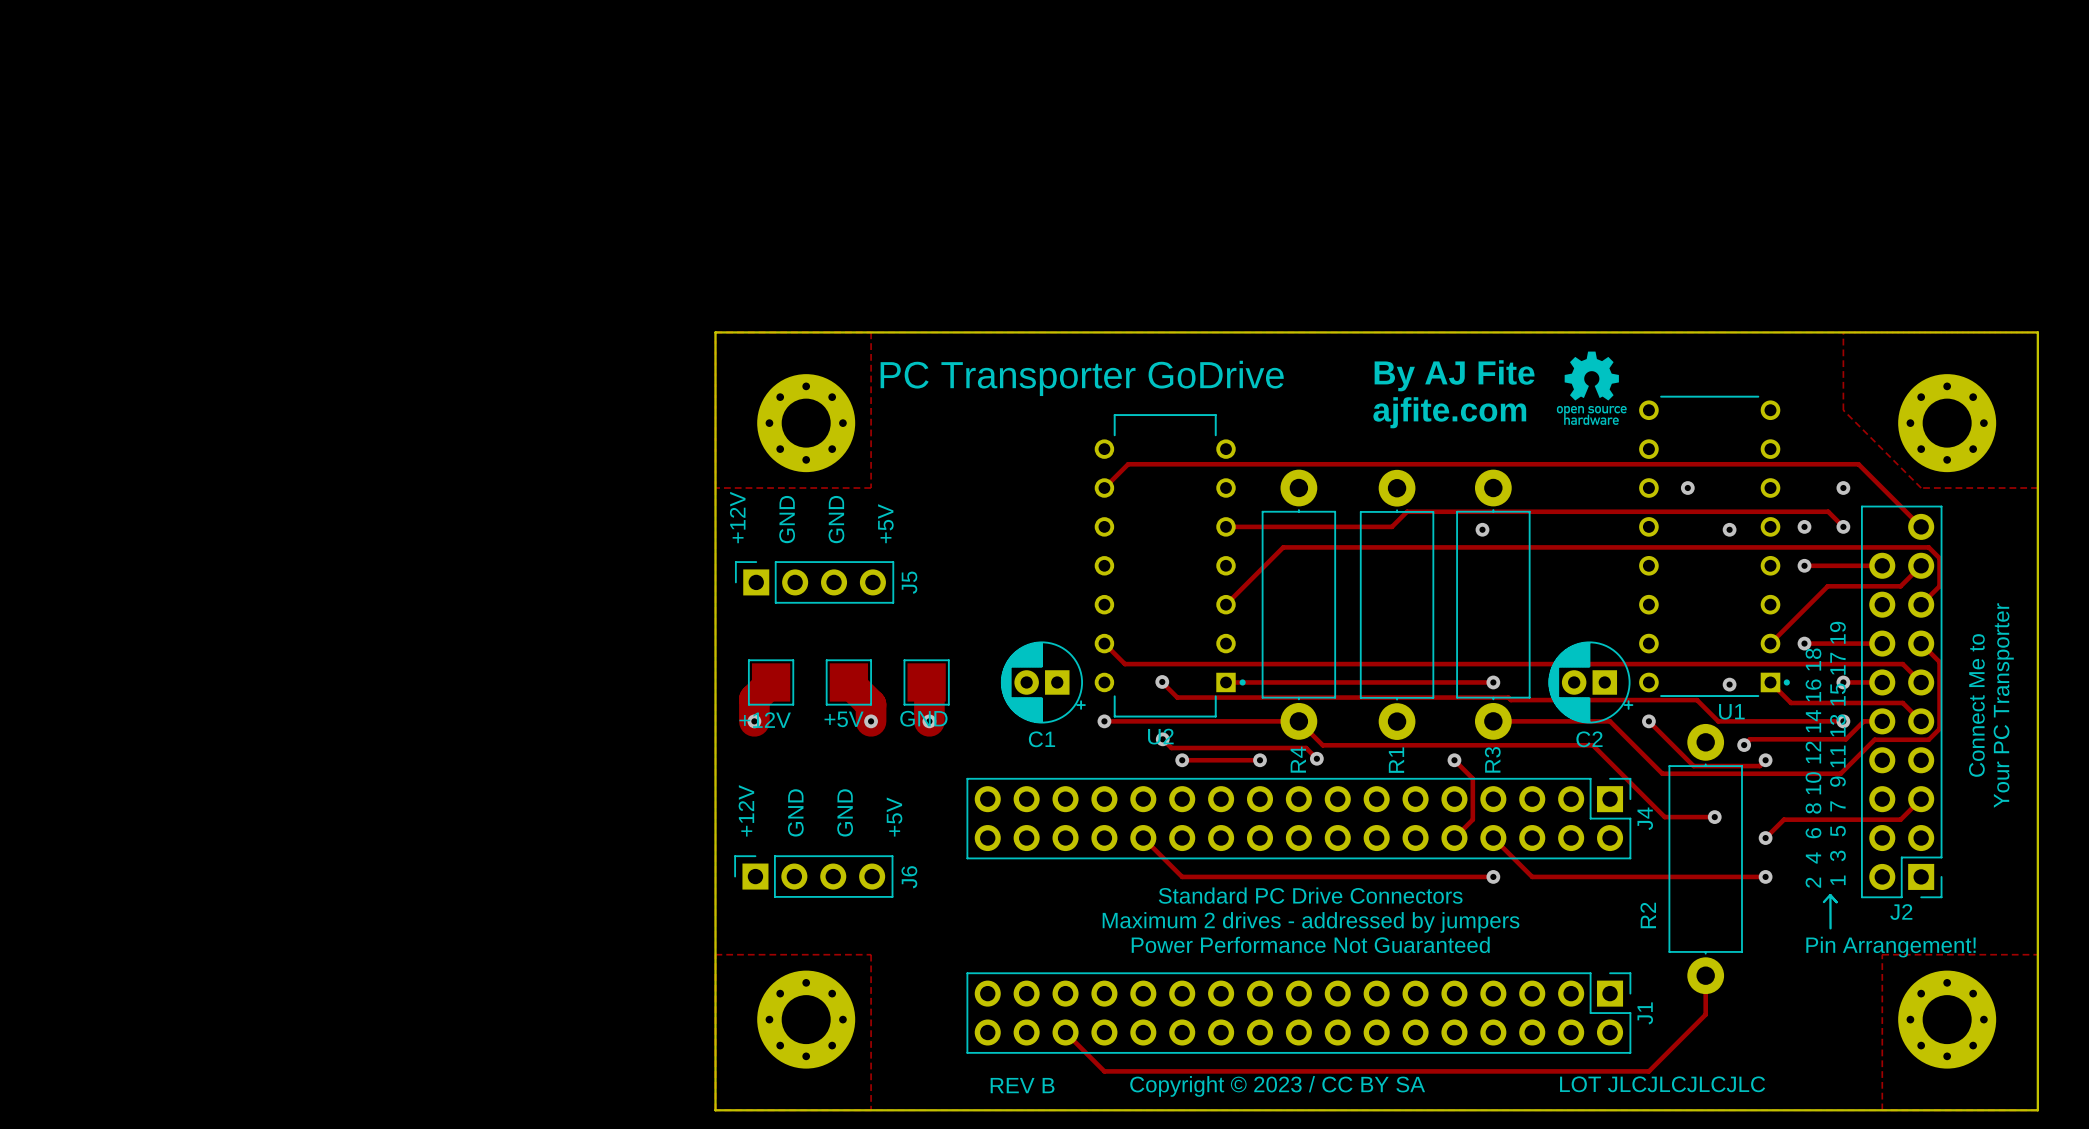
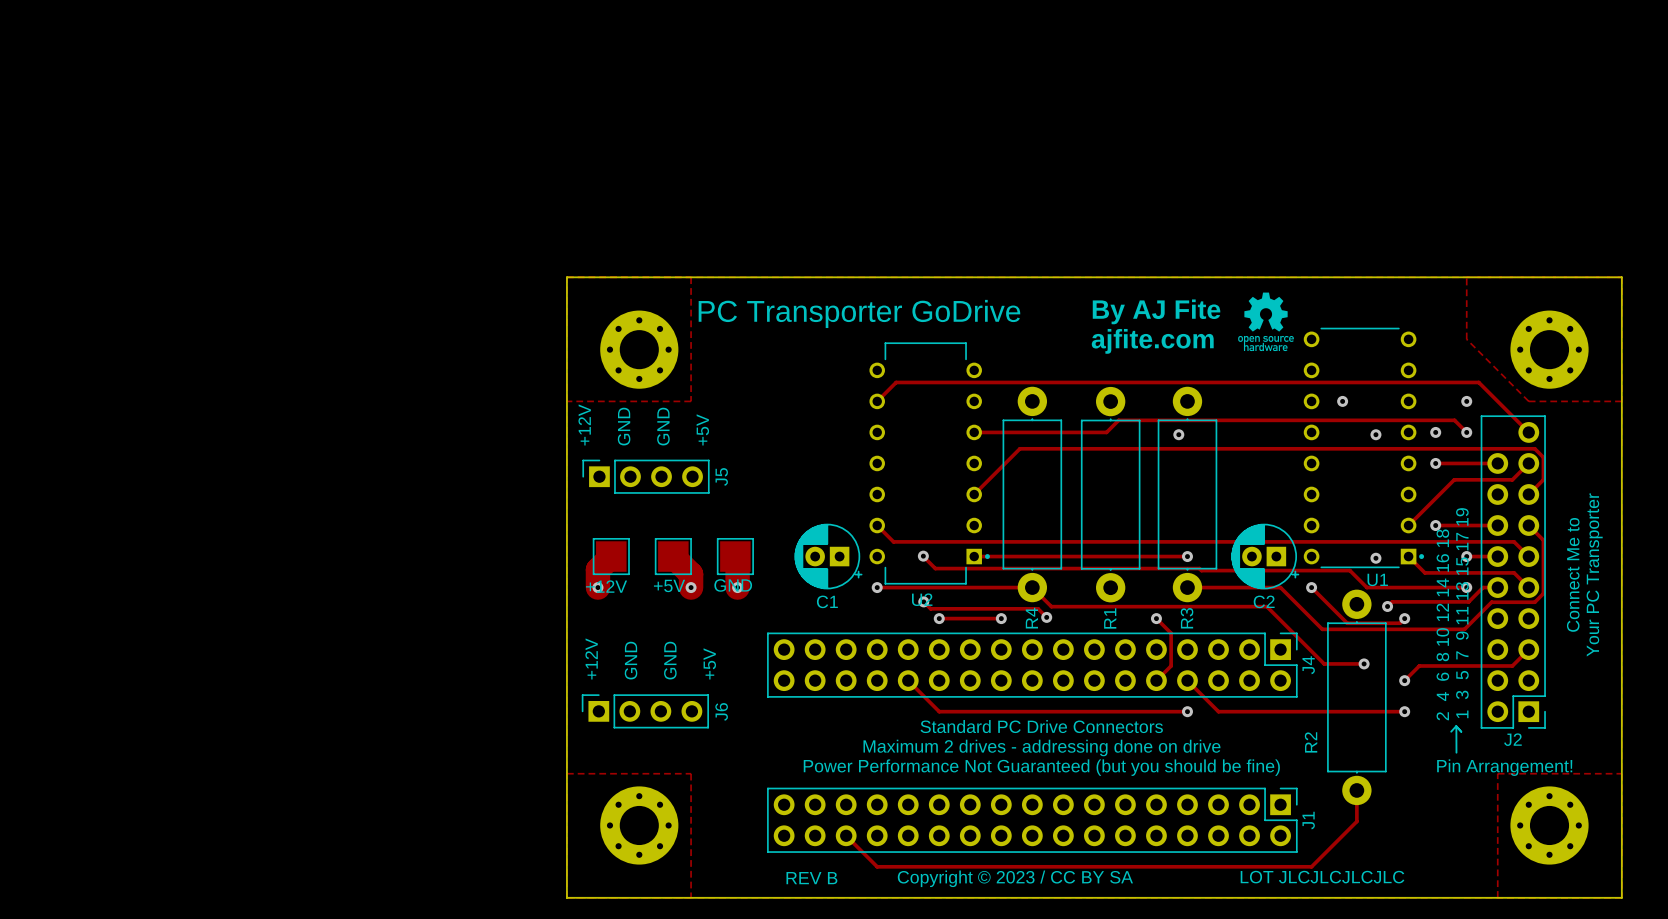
text: Maximum 2 drives - addressed by jumpers (1311, 922) -> Maximum 2 drives - addressing done on drive (1041, 747)
text: Power Performance Not Guaranteed (1310, 944) -> Power Performance Not Guaranteed (but you should be fine) (1041, 767)

